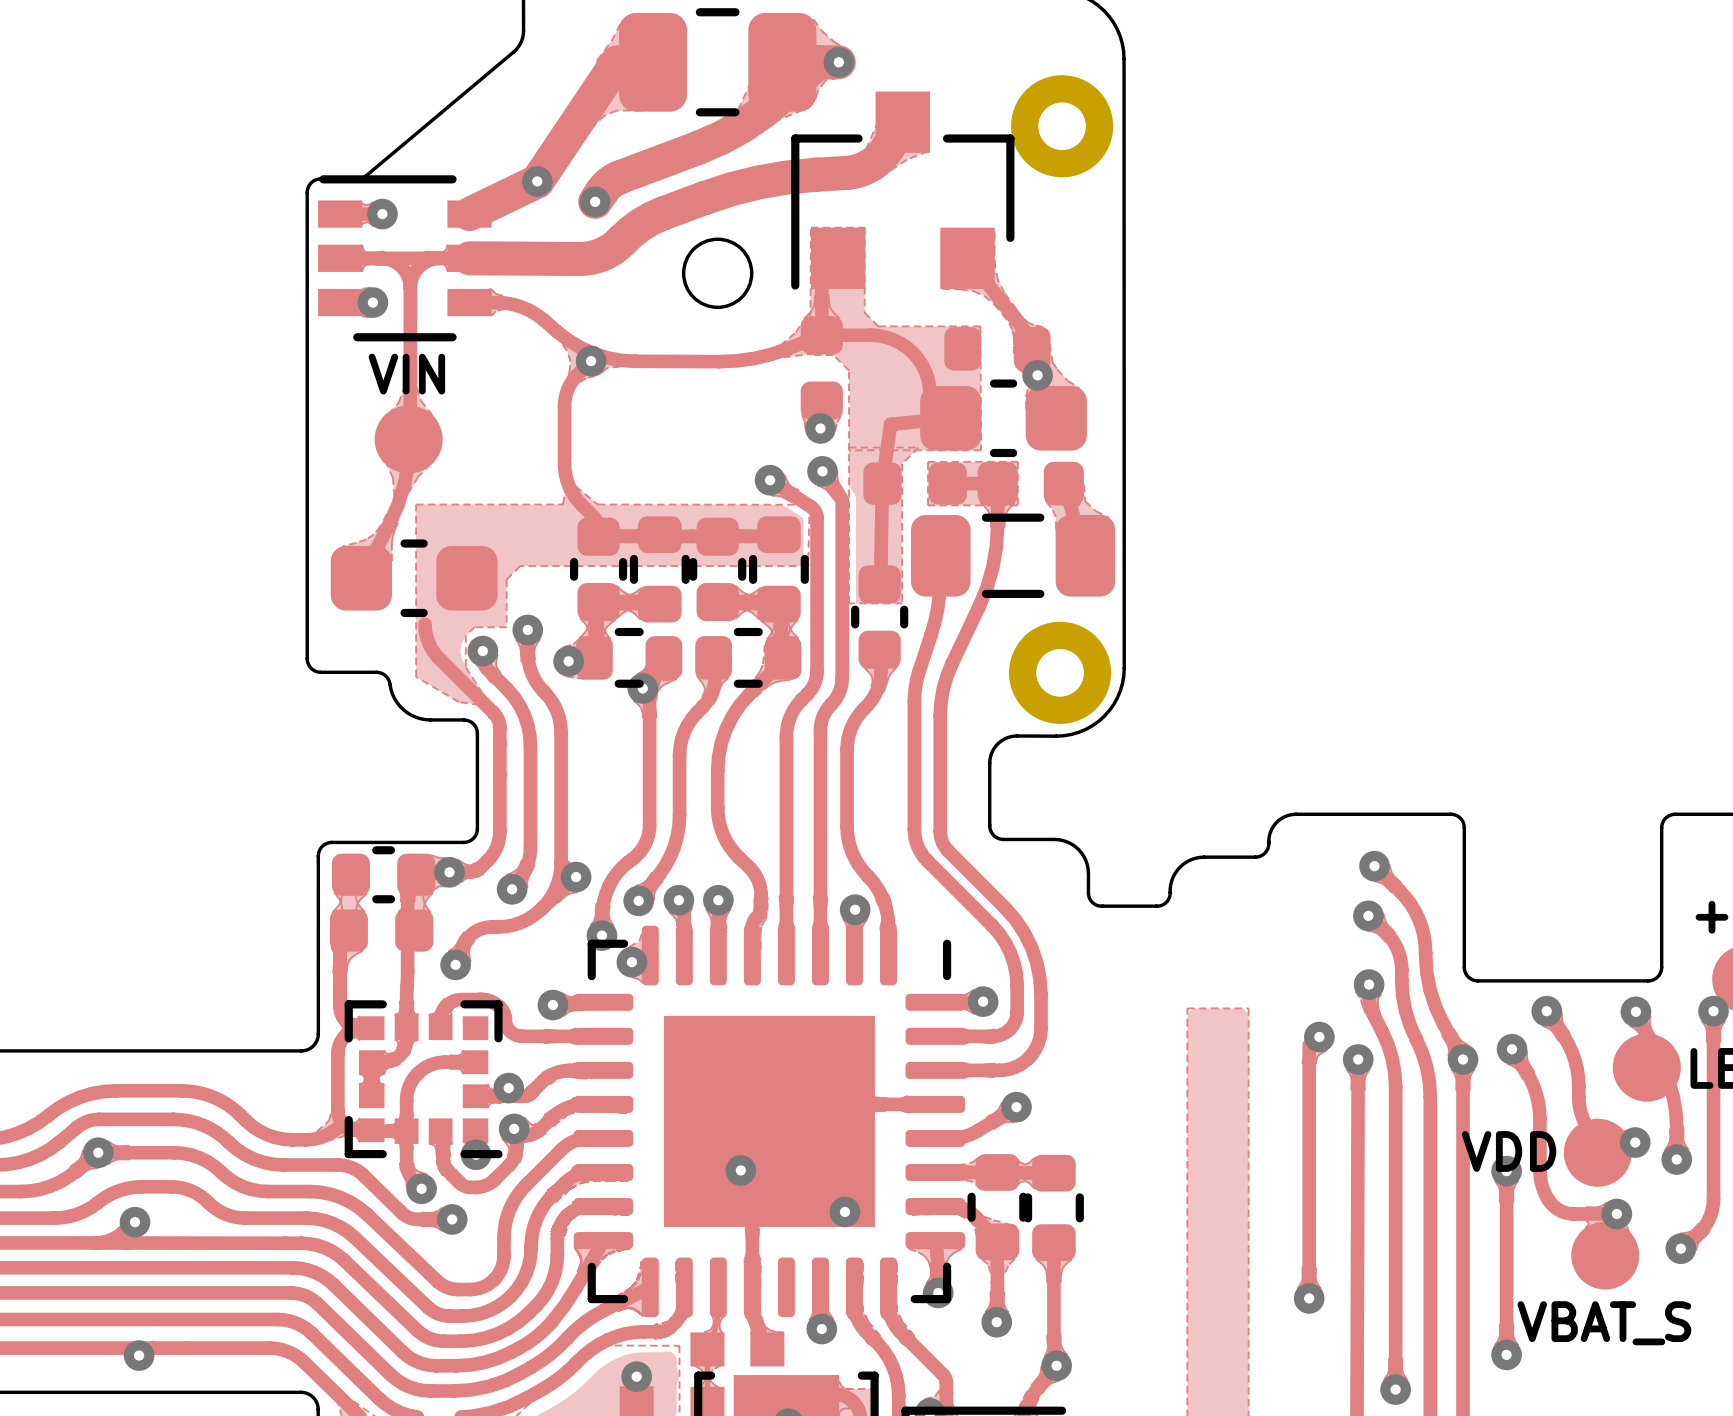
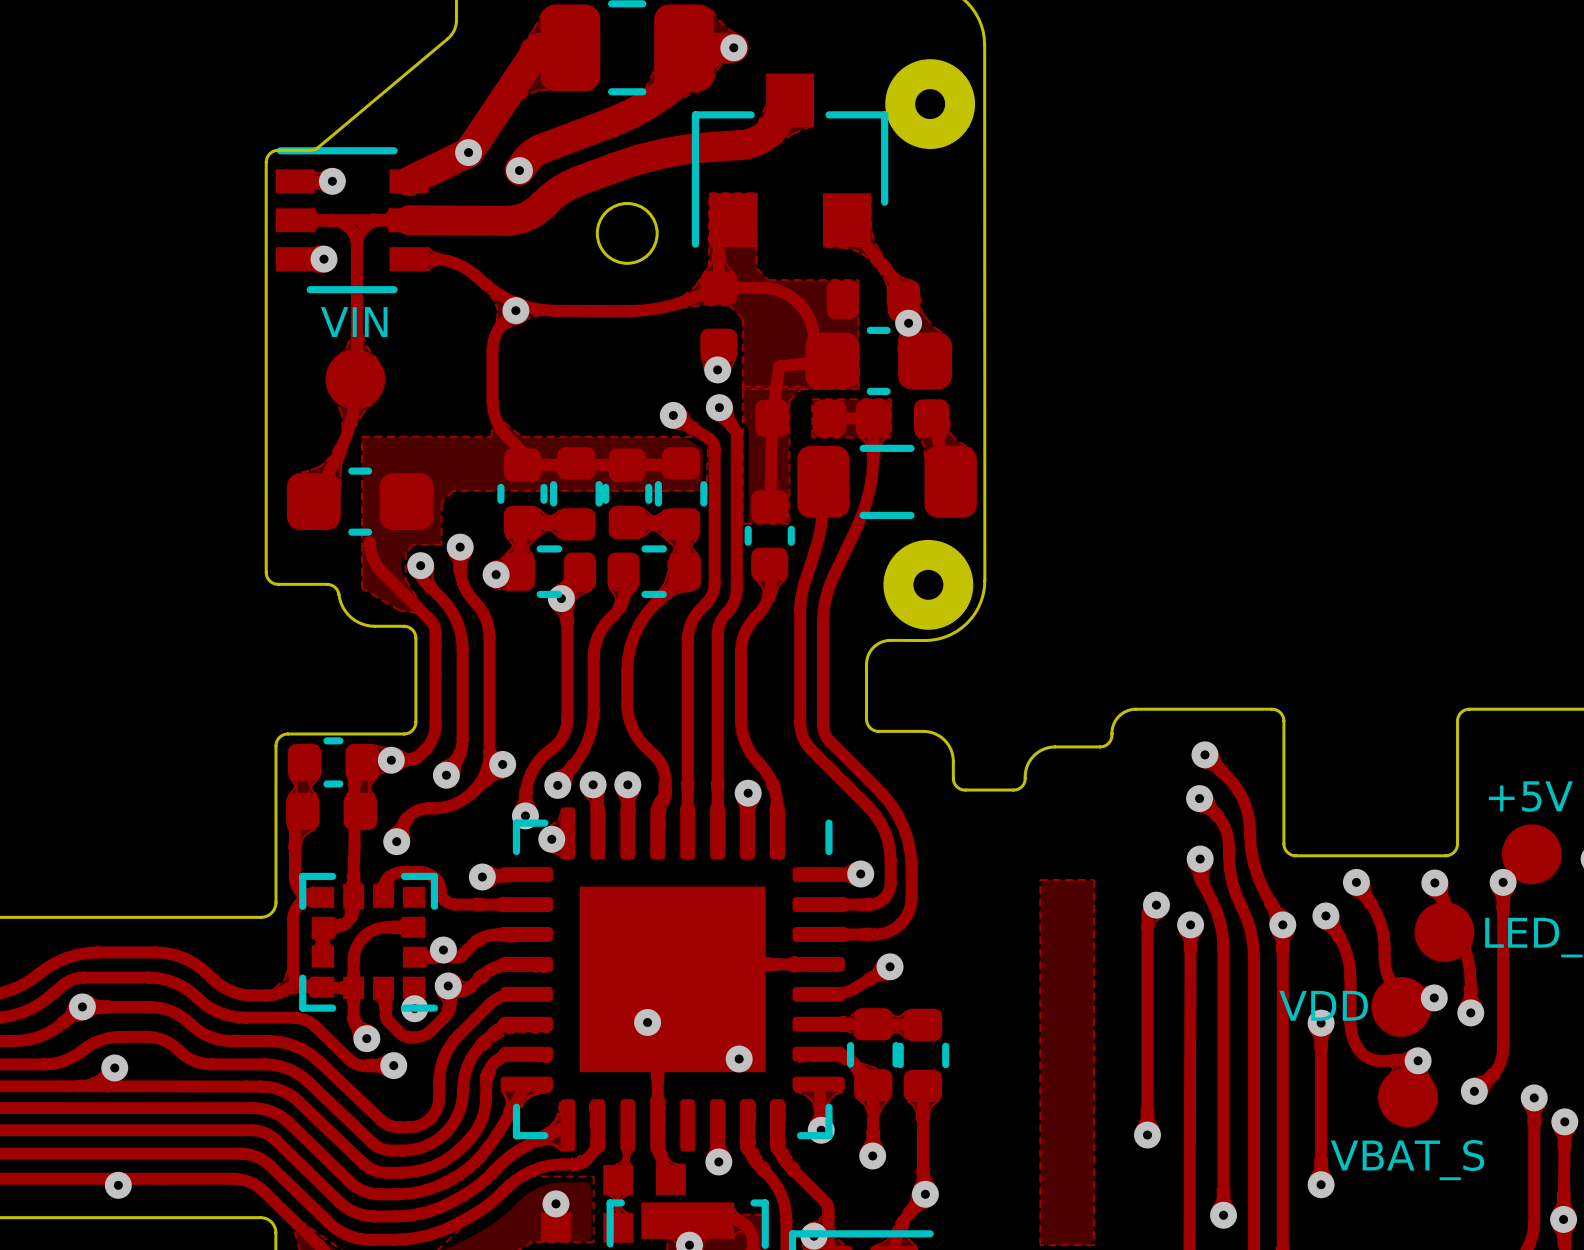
part footprint: [1011, 75, 1114, 178] -> [885, 59, 976, 149]
part footprint: [1009, 621, 1112, 724] -> [883, 539, 974, 630]

